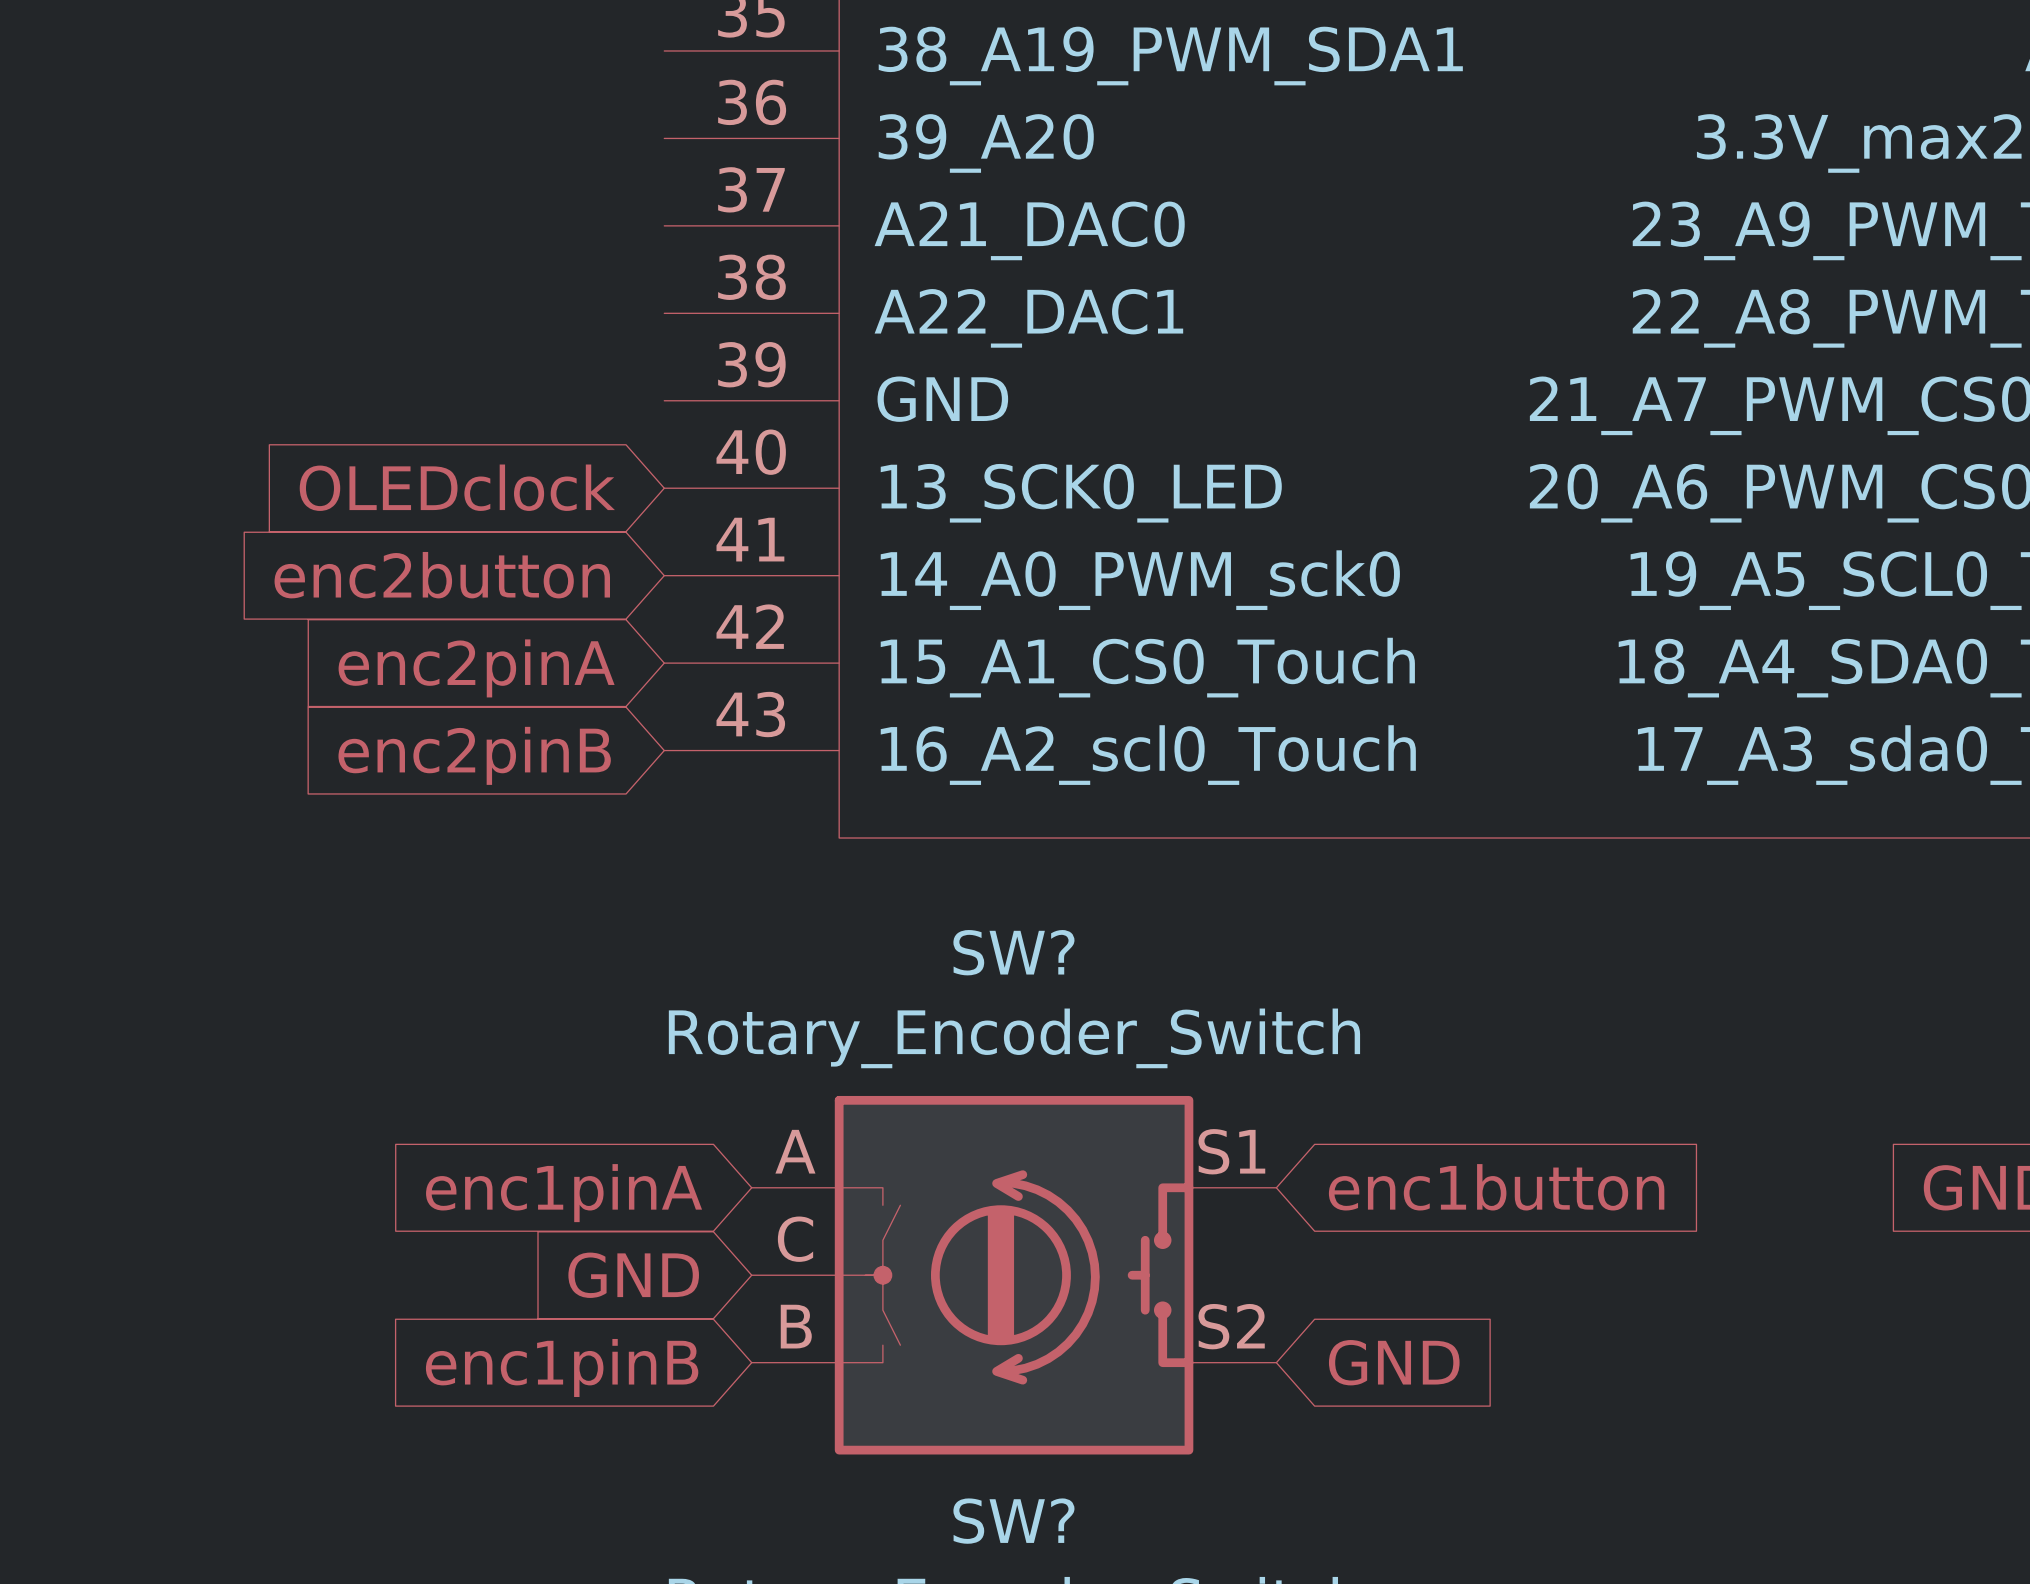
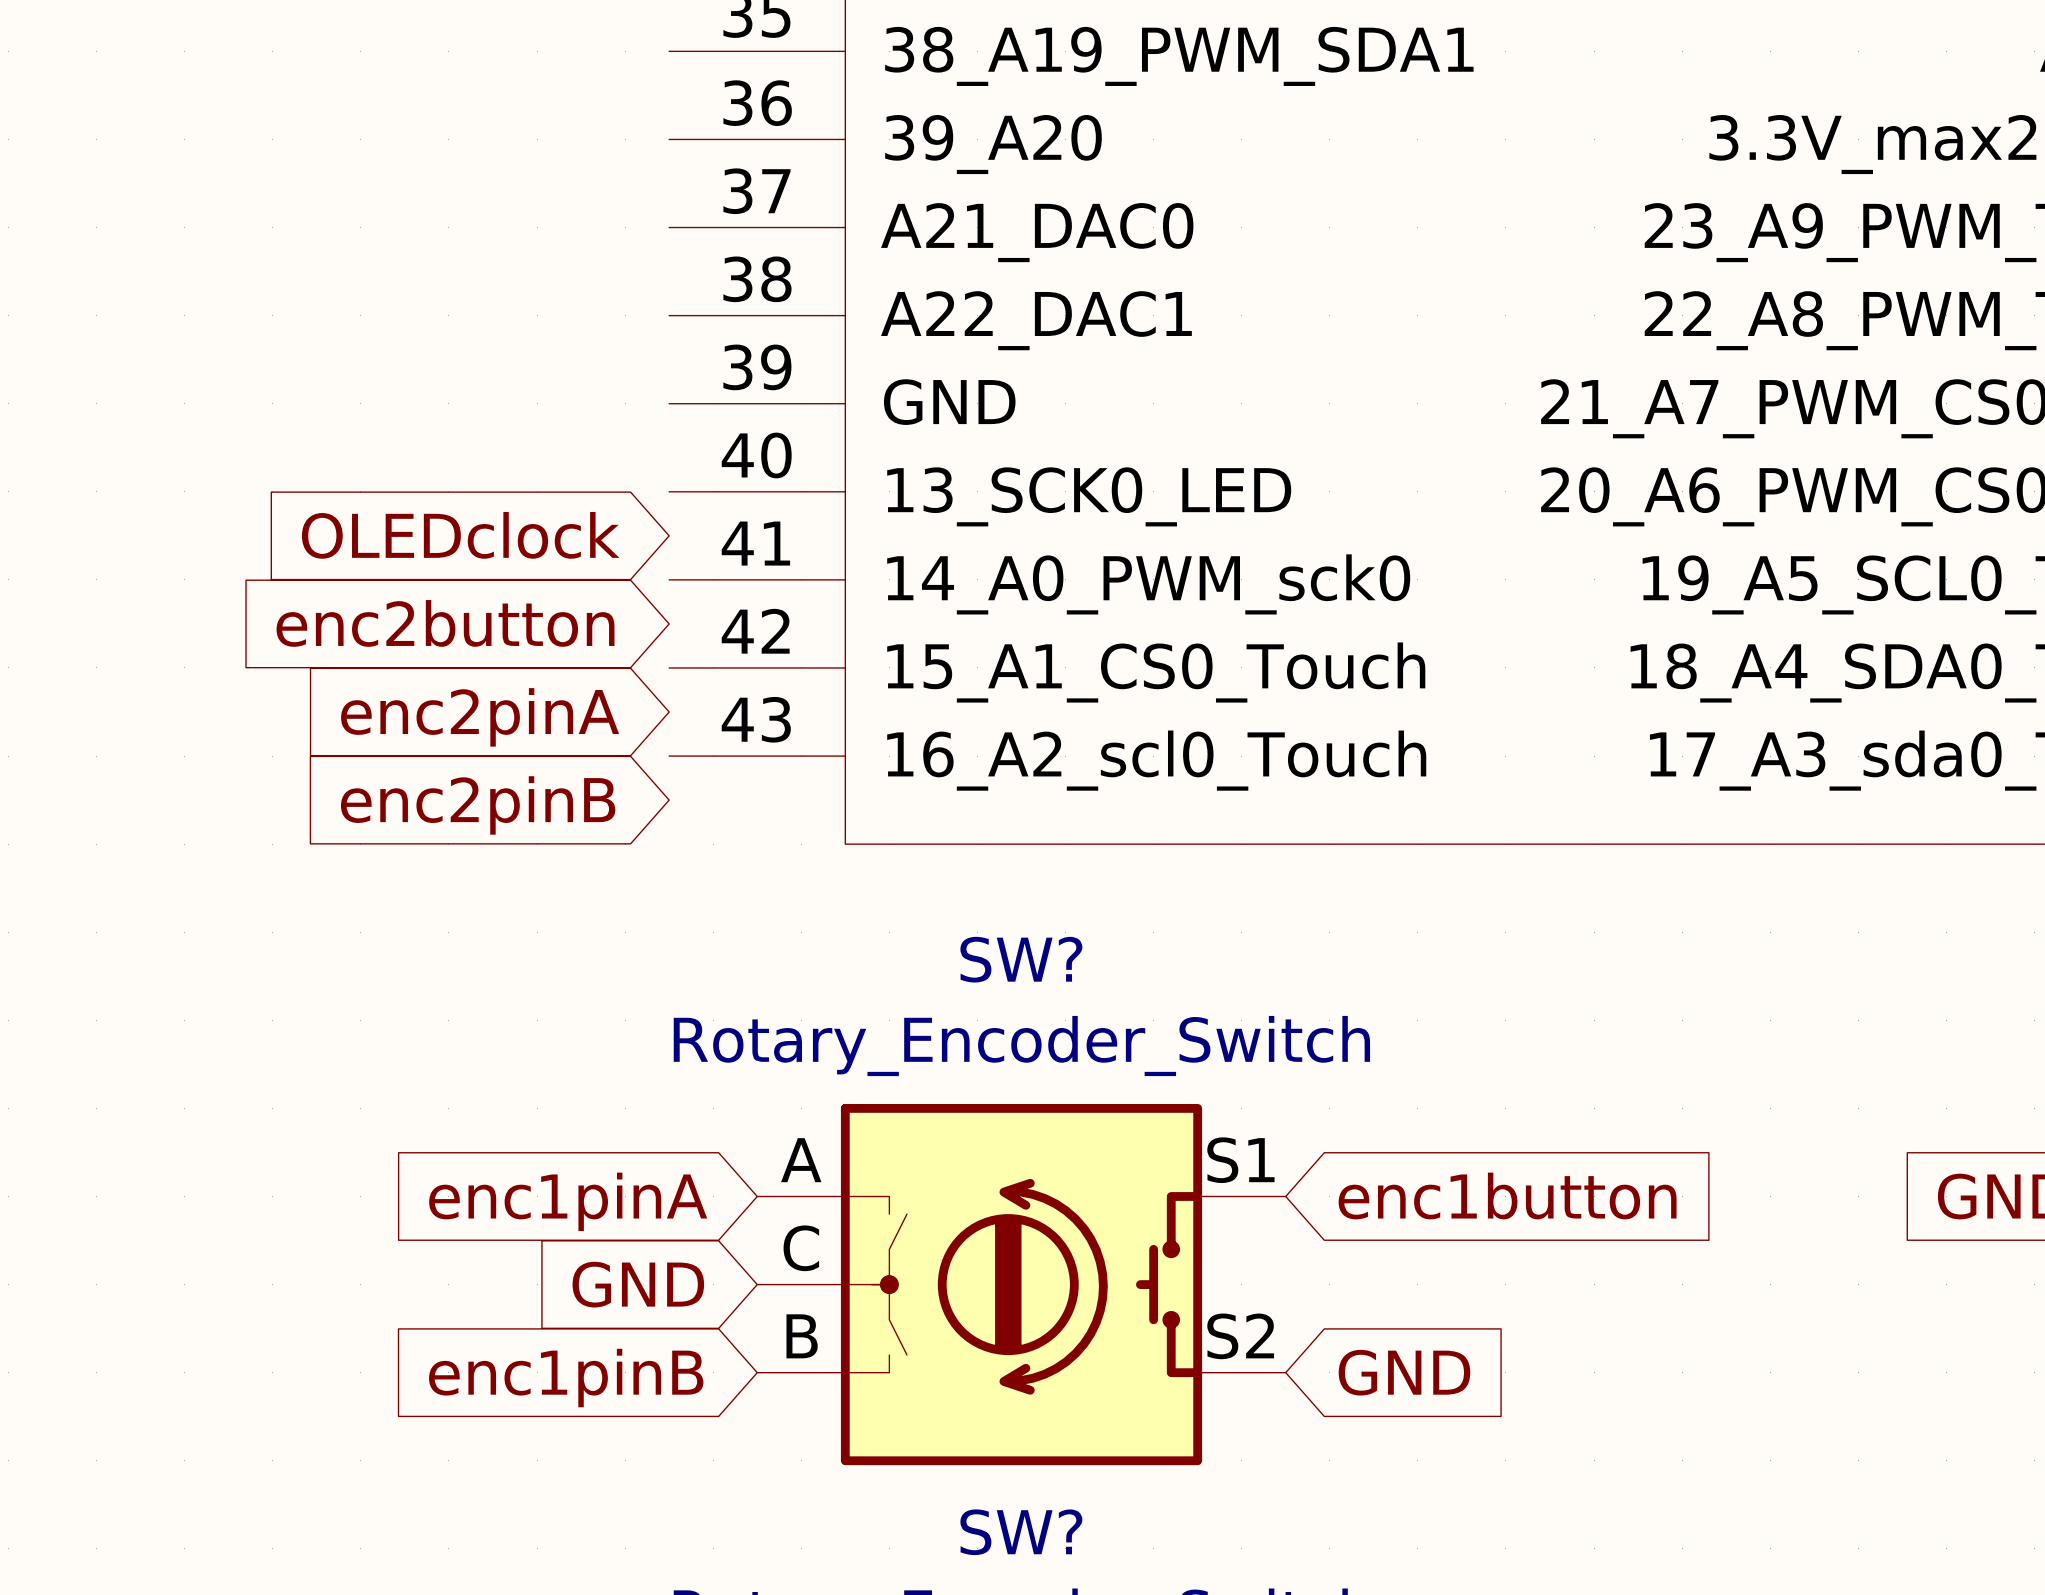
global label position: OLEDclock (457, 487) -> OLEDclock (460, 535)
global label position: enc2button (442, 575) -> enc2button (445, 623)
global label position: enc2pinA (476, 668) -> enc2pinA (480, 717)
global label position: enc2pinB (474, 755) -> enc2pinB (478, 805)

